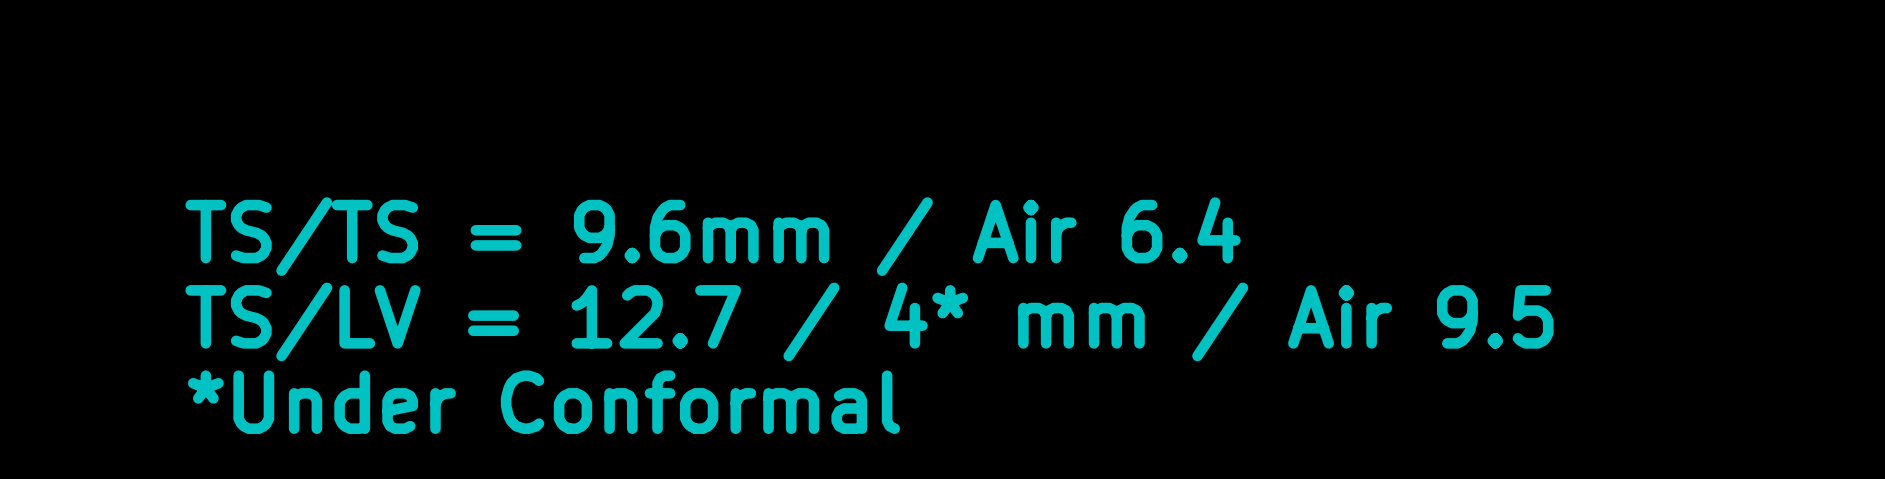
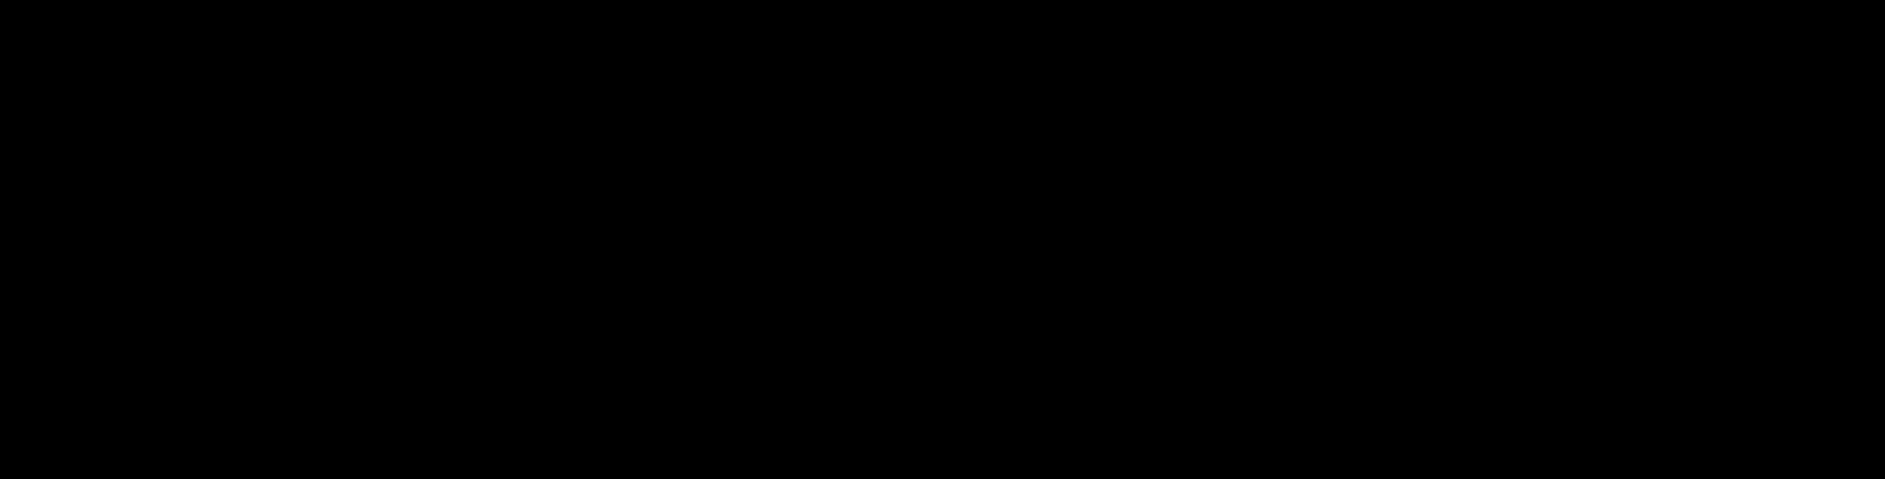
text: TS/TS = 9.6mm / Air 6.4 (713, 236) -> none
text: TS/LV = 12.7 / 4* mm / Air 9.5 (869, 321) -> none
text: *Under Conformal (543, 402) -> none

